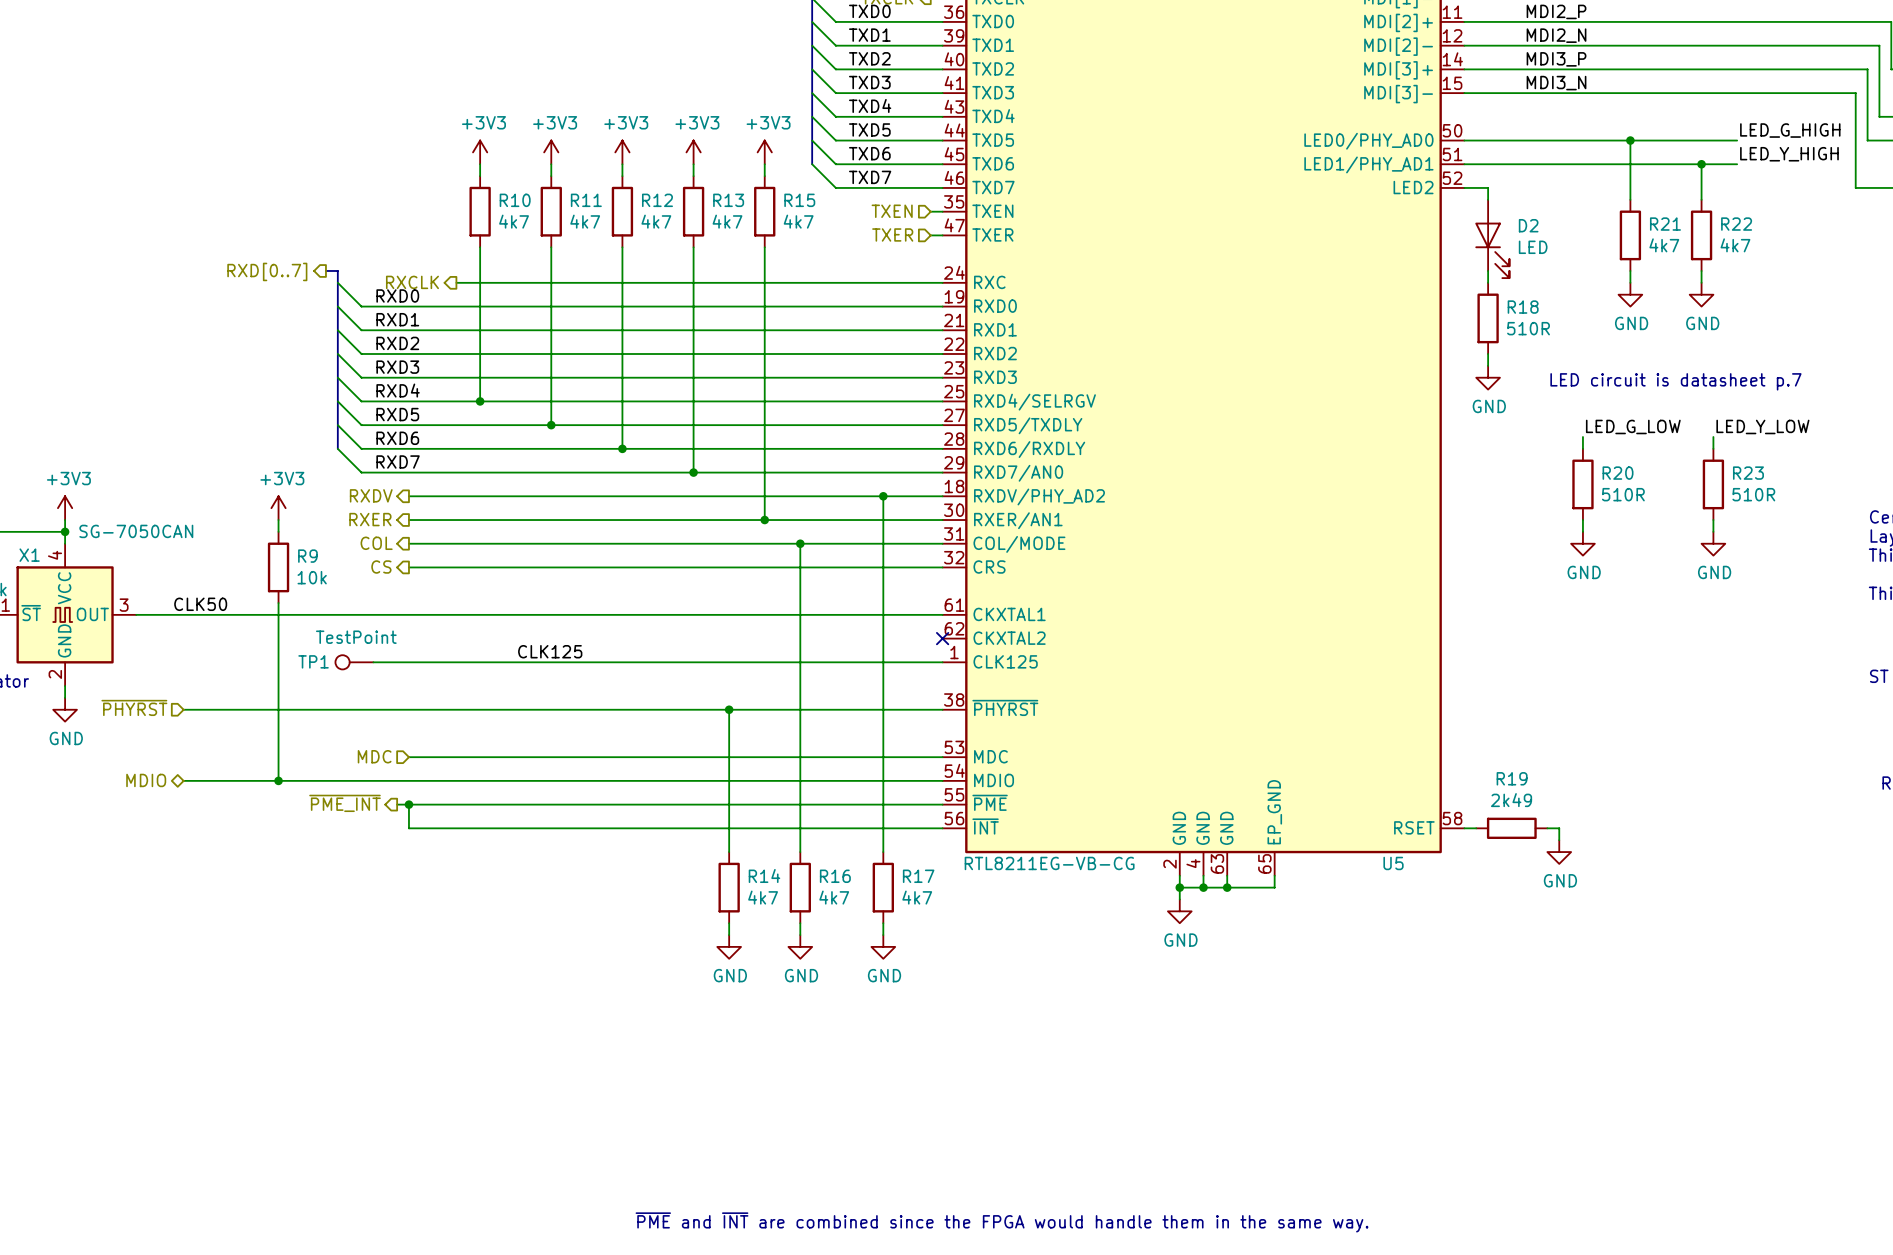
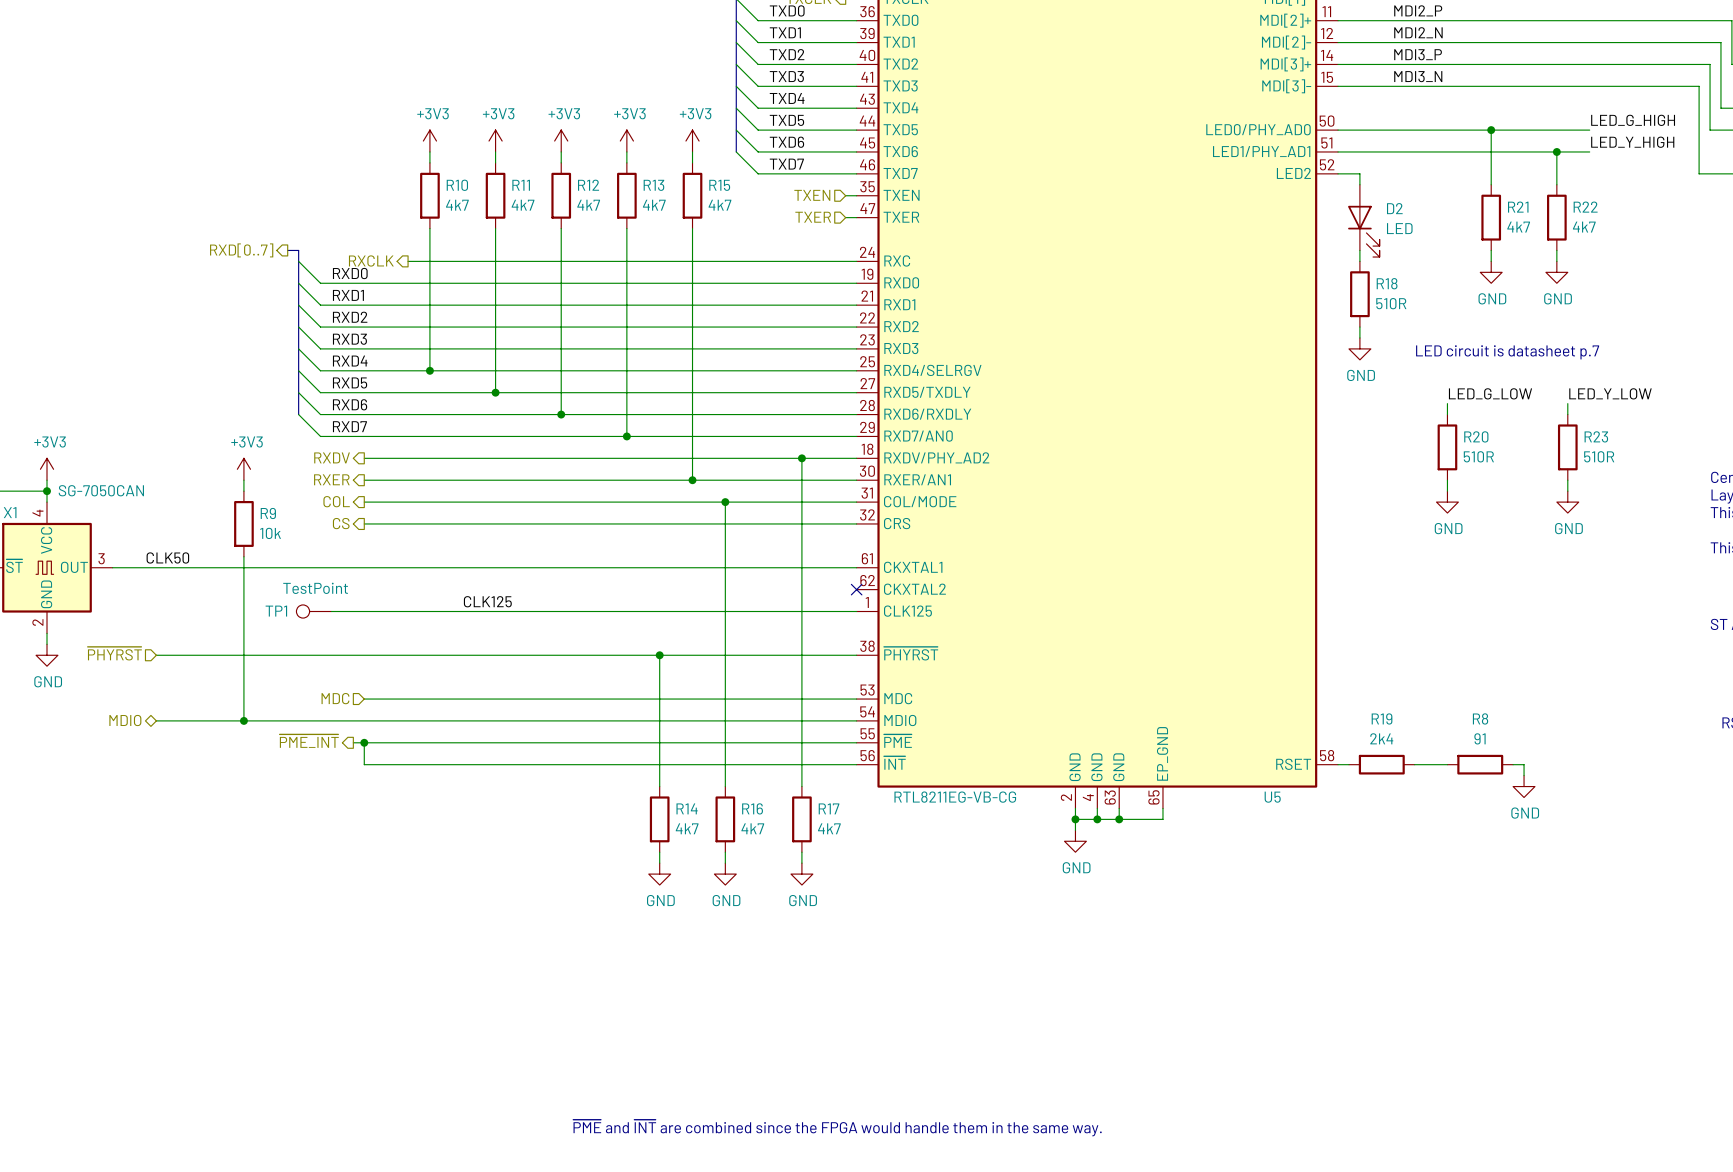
R19 value: 2k49 (1511, 800) -> 2k4 (1381, 738)
wire: (1559, 828) (1559, 840) -> (1425, 764) (1447, 764)
R8: none -> 91 (1480, 764)
wire: none -> (1513, 764) (1524, 764) (1524, 775)
power symbol position: GND (1559, 852) -> GND (1524, 786)

